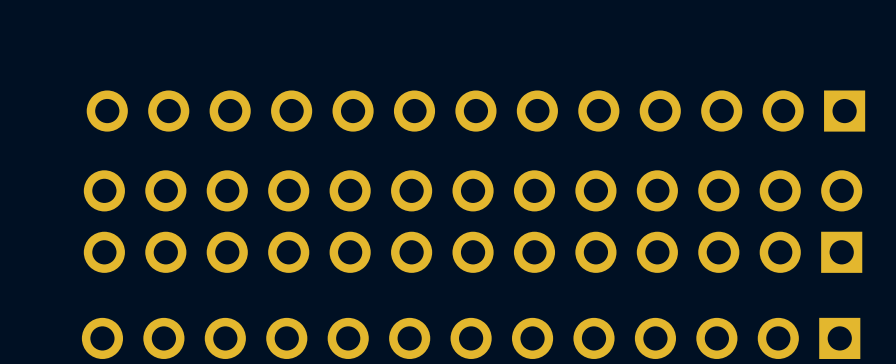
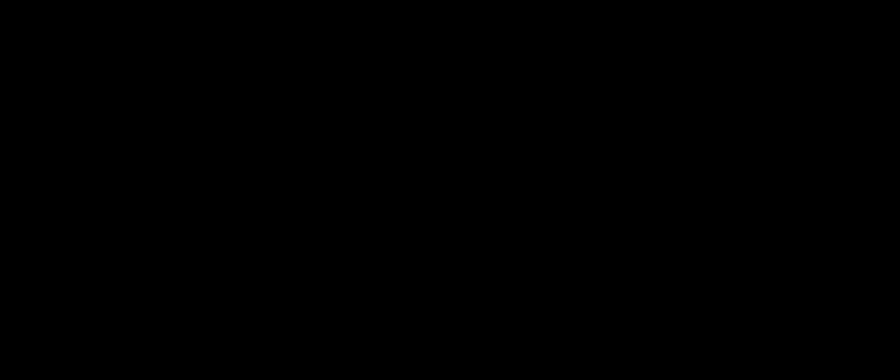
part: (475, 111) -> none
part: (473, 221) -> none
part: (471, 338) -> none

